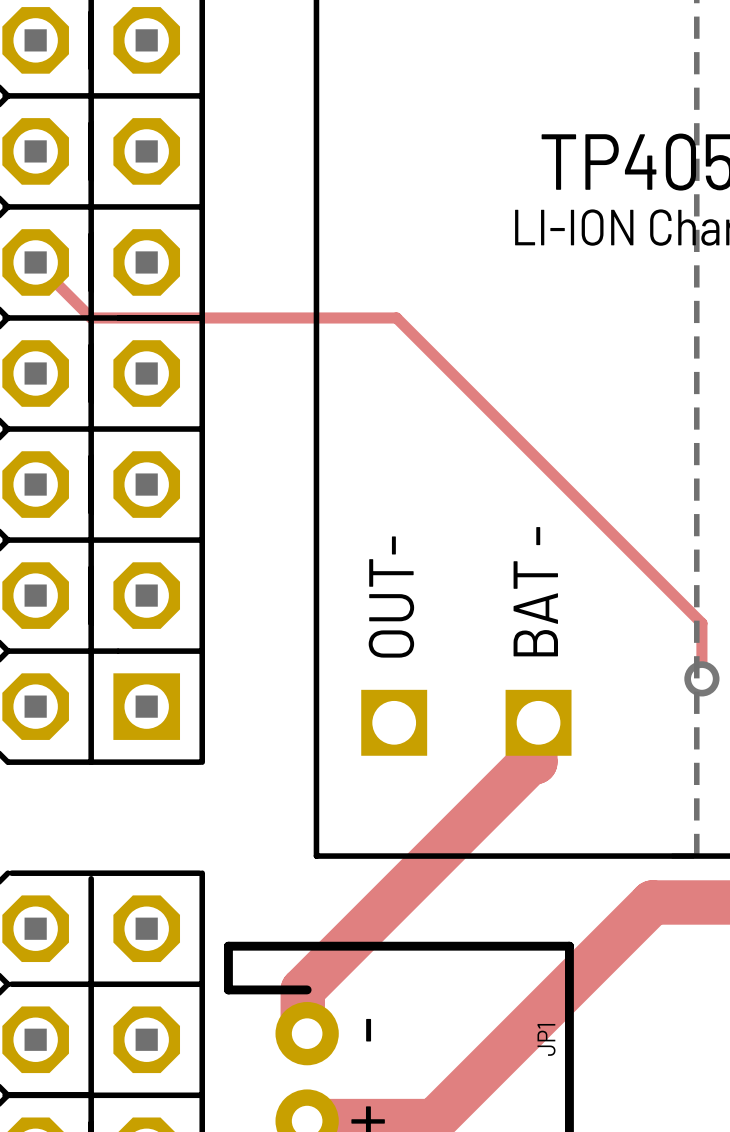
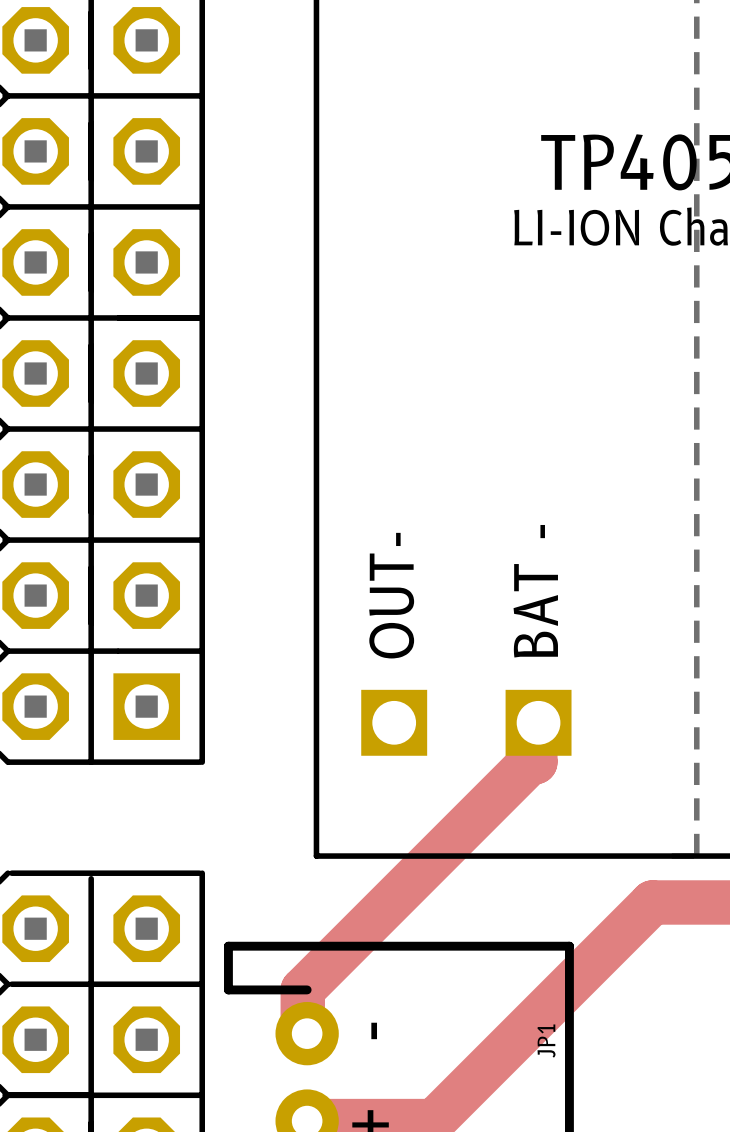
track: (35, 262) (91, 317) (396, 317) (701, 623) (701, 678) -> none
via: (701, 678) -> none

